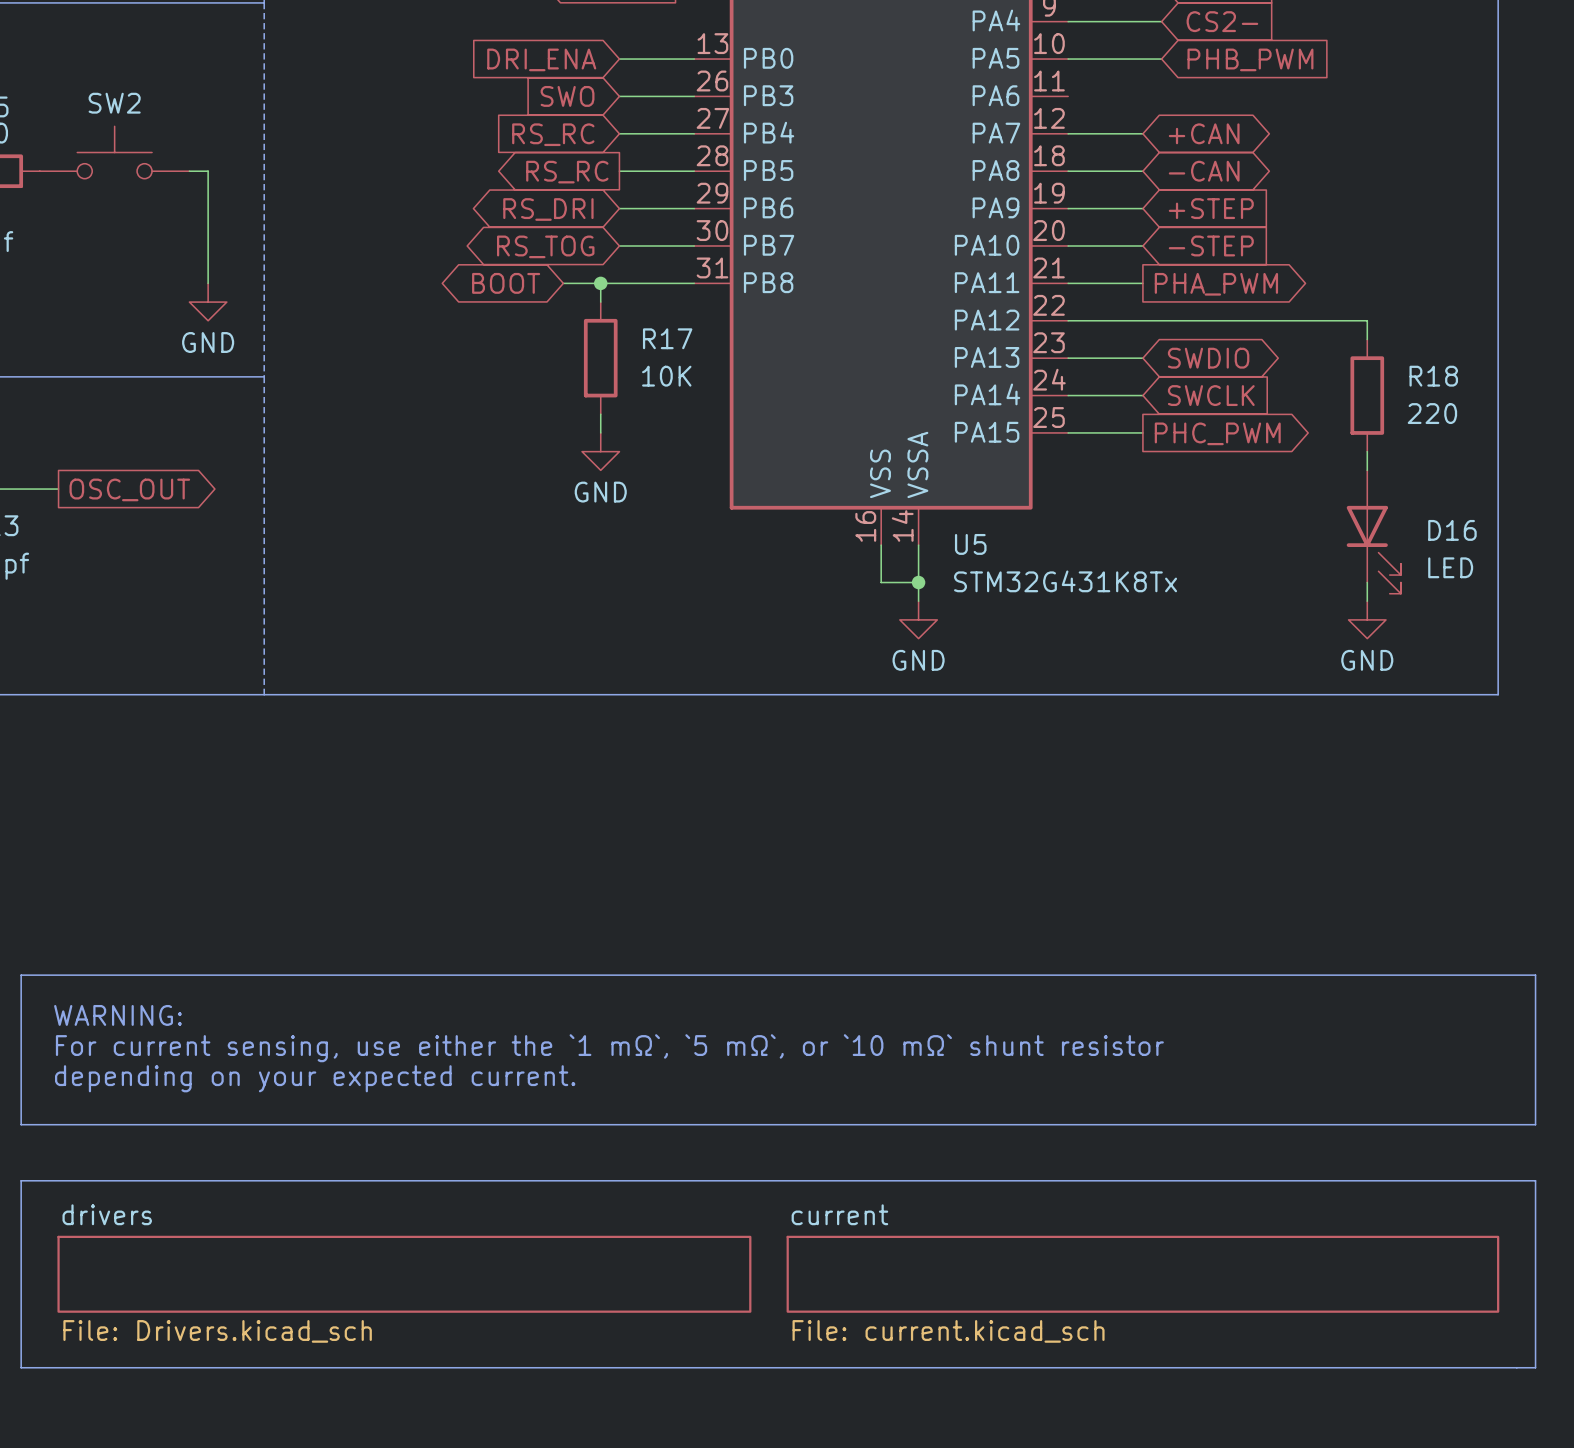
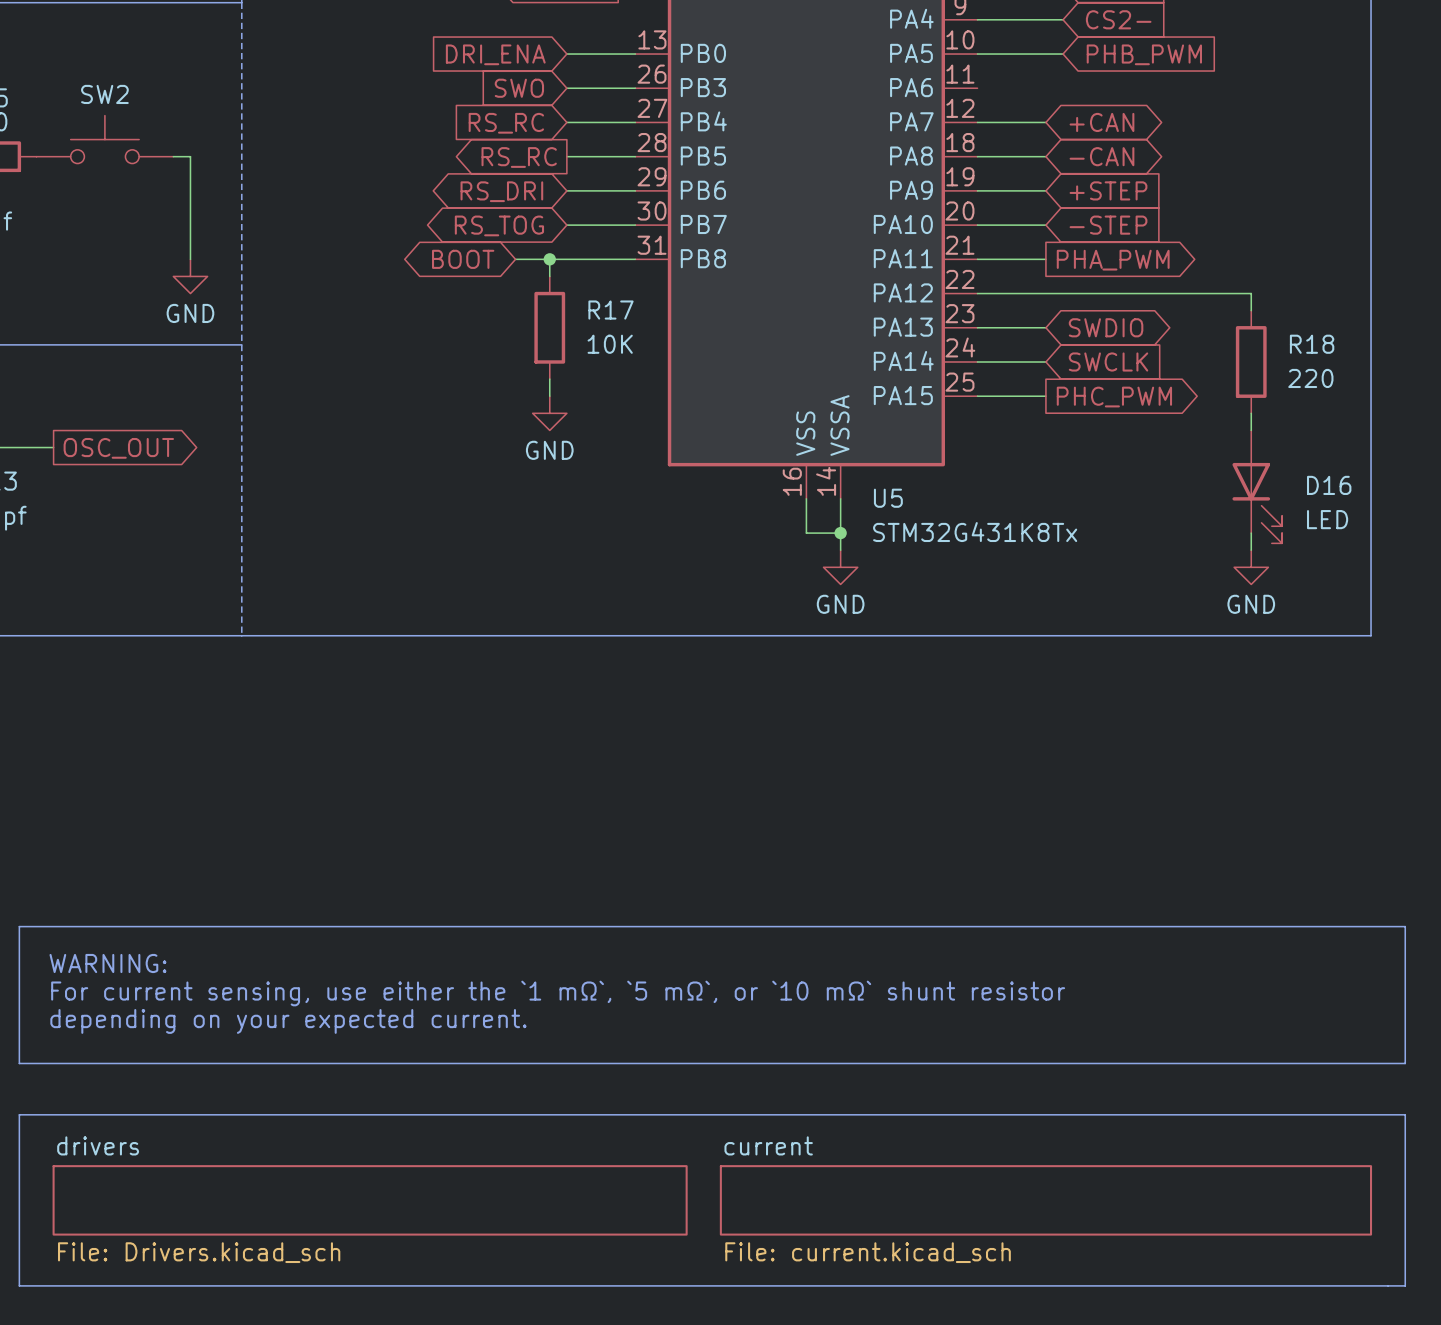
line: (21, 1012) (21, 975) (1535, 975) (1535, 1012) -> (19, 926) (1405, 926)
text position: WARNING: (117, 1015) -> WARNING: (107, 963)
text position: For current sensing, use either the `1 mΩ`, `5 mΩ`, or `10 mΩ` shunt resistor (609, 1048) -> For current sensing, use either the `1 mΩ`, `5 mΩ`, or `10 mΩ` shunt resistor (558, 993)
text position: depending on your expected current. (315, 1078) -> depending on your expected current. (288, 1021)
line: (21, 1124) (1535, 1124) -> (19, 1029) (19, 1063) (1405, 1063) (1405, 1029)
line: (21, 1218) (21, 1180) (1535, 1180) (1535, 1218) -> (19, 1114) (1405, 1114)
sheet drivers position: (404, 1274) -> (370, 1200)
sheet current position: (1142, 1274) -> (1045, 1200)
line: (21, 1367) (1535, 1367) -> (19, 1251) (19, 1285) (1405, 1285) (1405, 1251)

